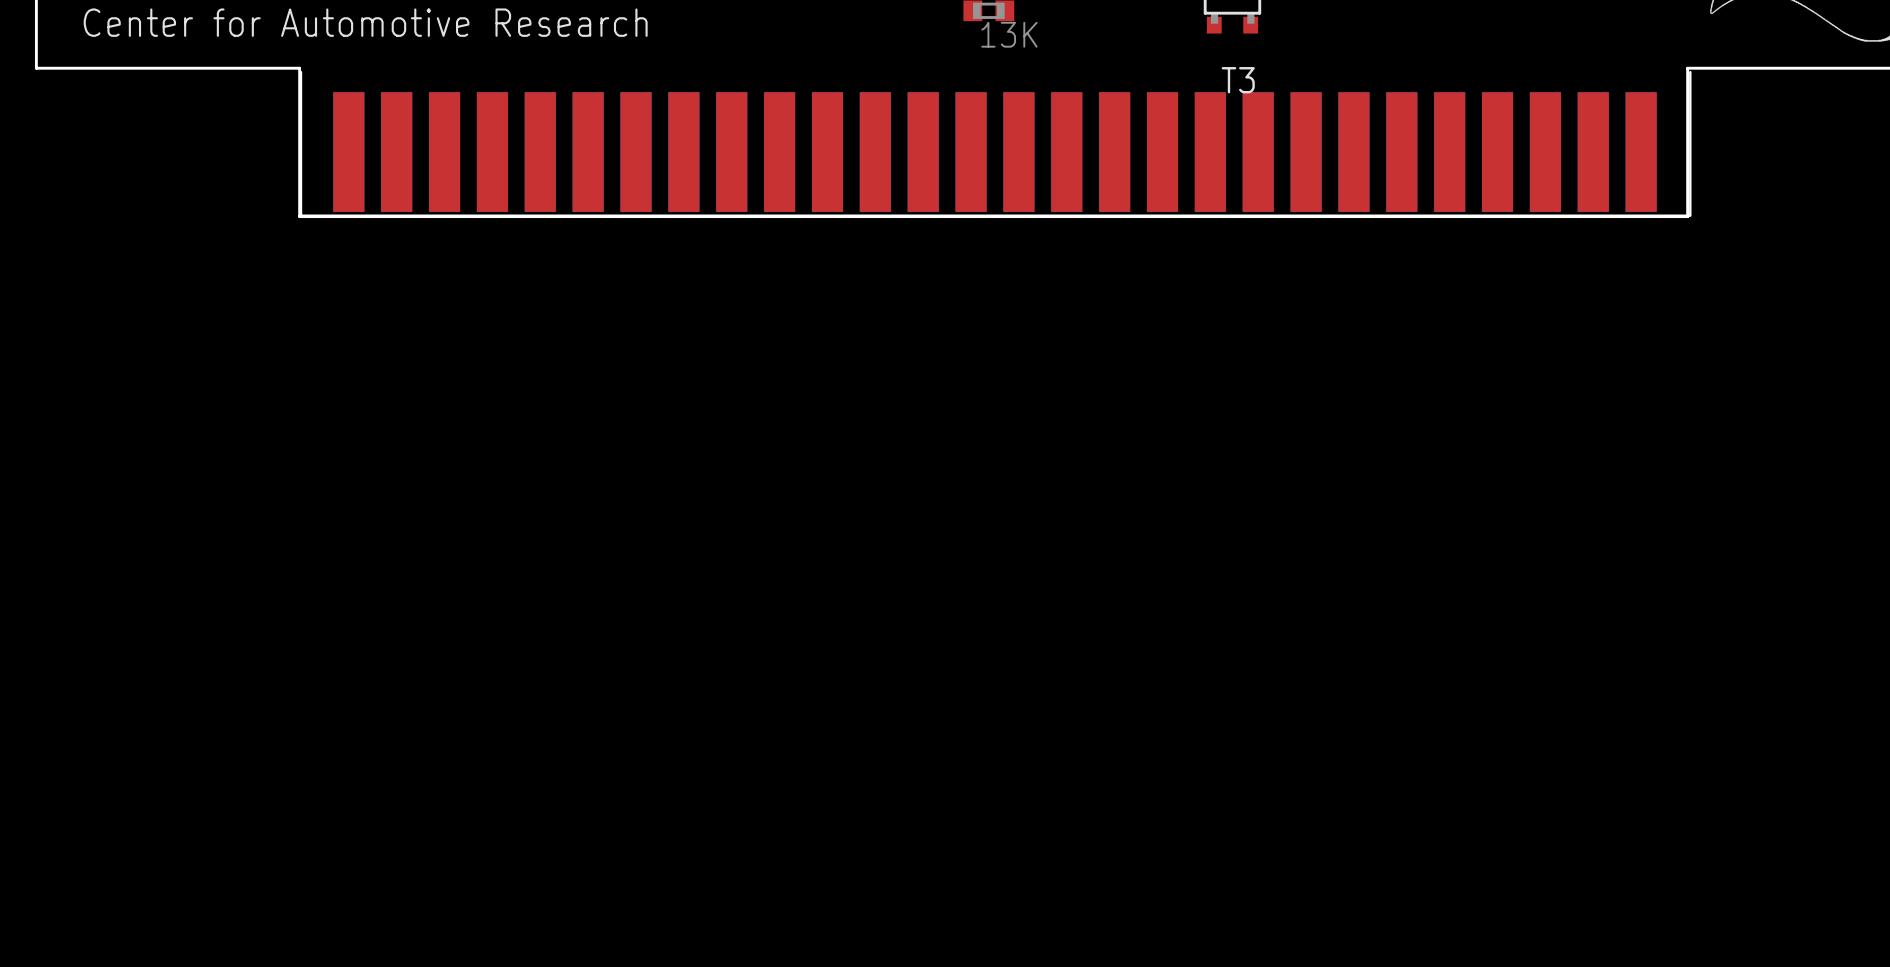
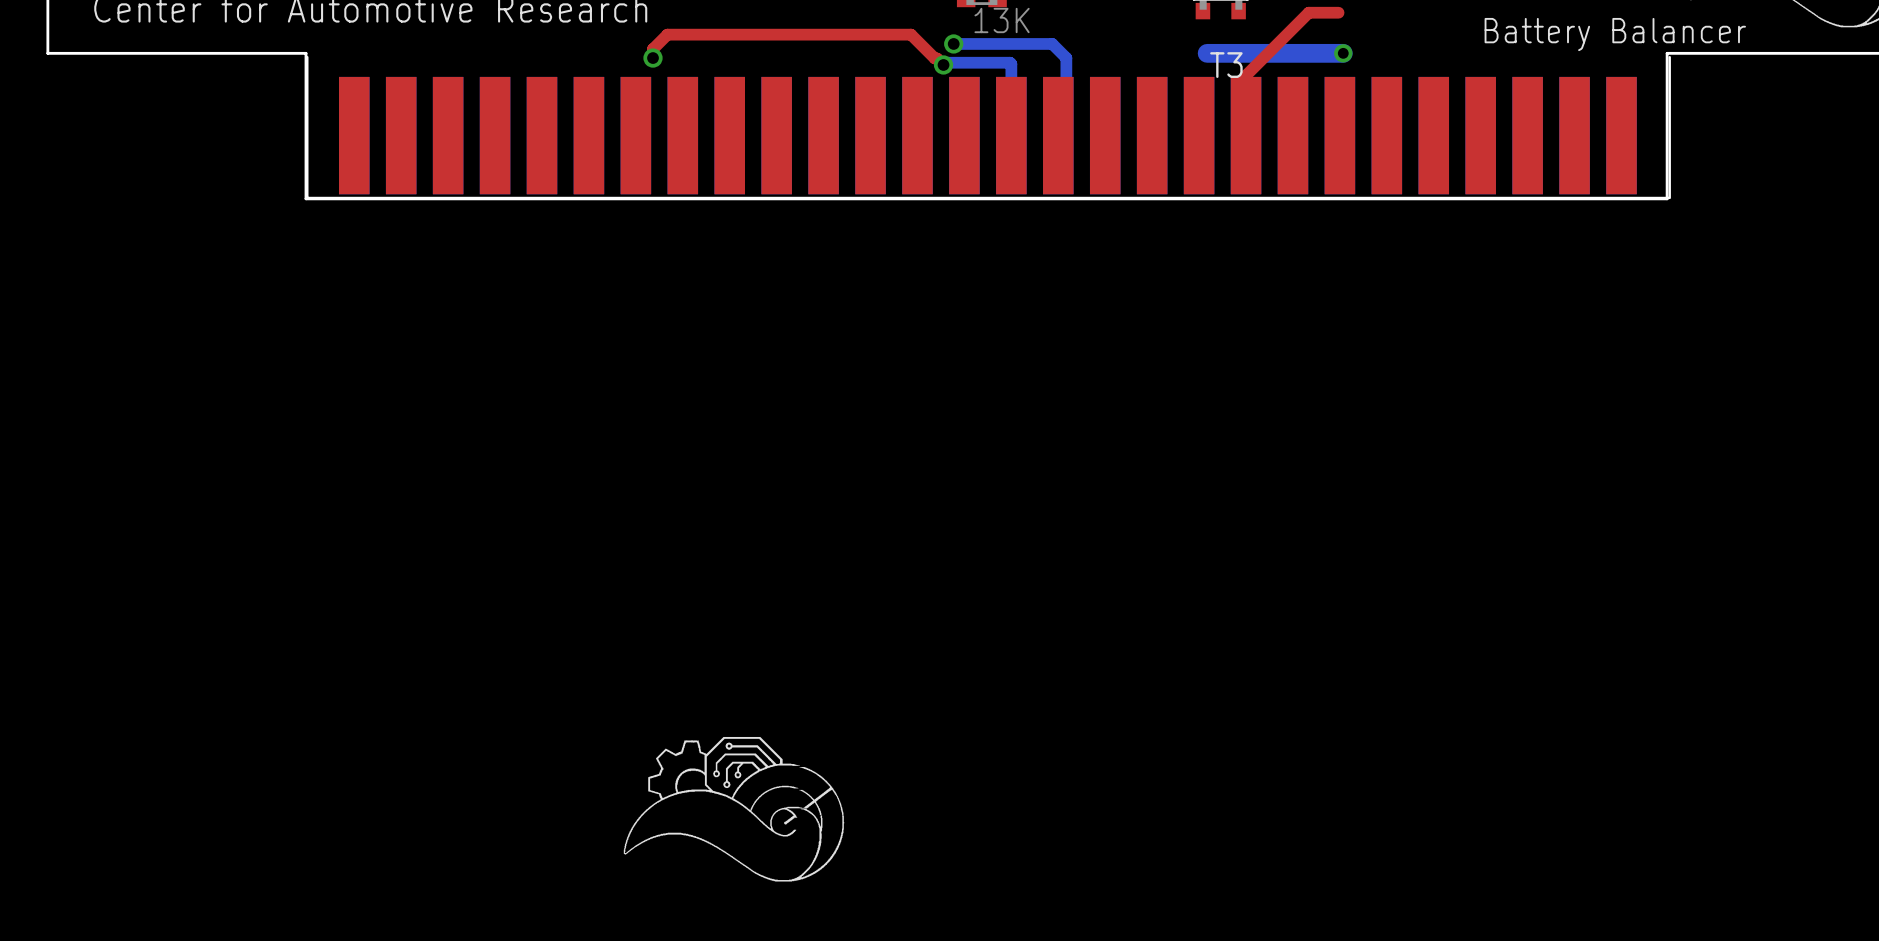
top track: none -> (1338, 12) (1308, 12) (1246, 75) (1246, 135)
text: none -> Battery Balancer (1615, 34)
bottom track: none -> (953, 43) (1052, 43) (1066, 58) (1066, 127) (1058, 135)
via: none -> (953, 43)
bottom track: none -> (1207, 53) (1343, 53)
via: none -> (1343, 53)
top track: none -> (653, 58) (653, 49) (667, 34) (911, 34) (943, 64)
via: none -> (653, 58)
bottom track: none -> (943, 64) (945, 62) (1011, 64) (1011, 135)
via: none -> (943, 64)
drawing: none -> [623, 736, 845, 882]

